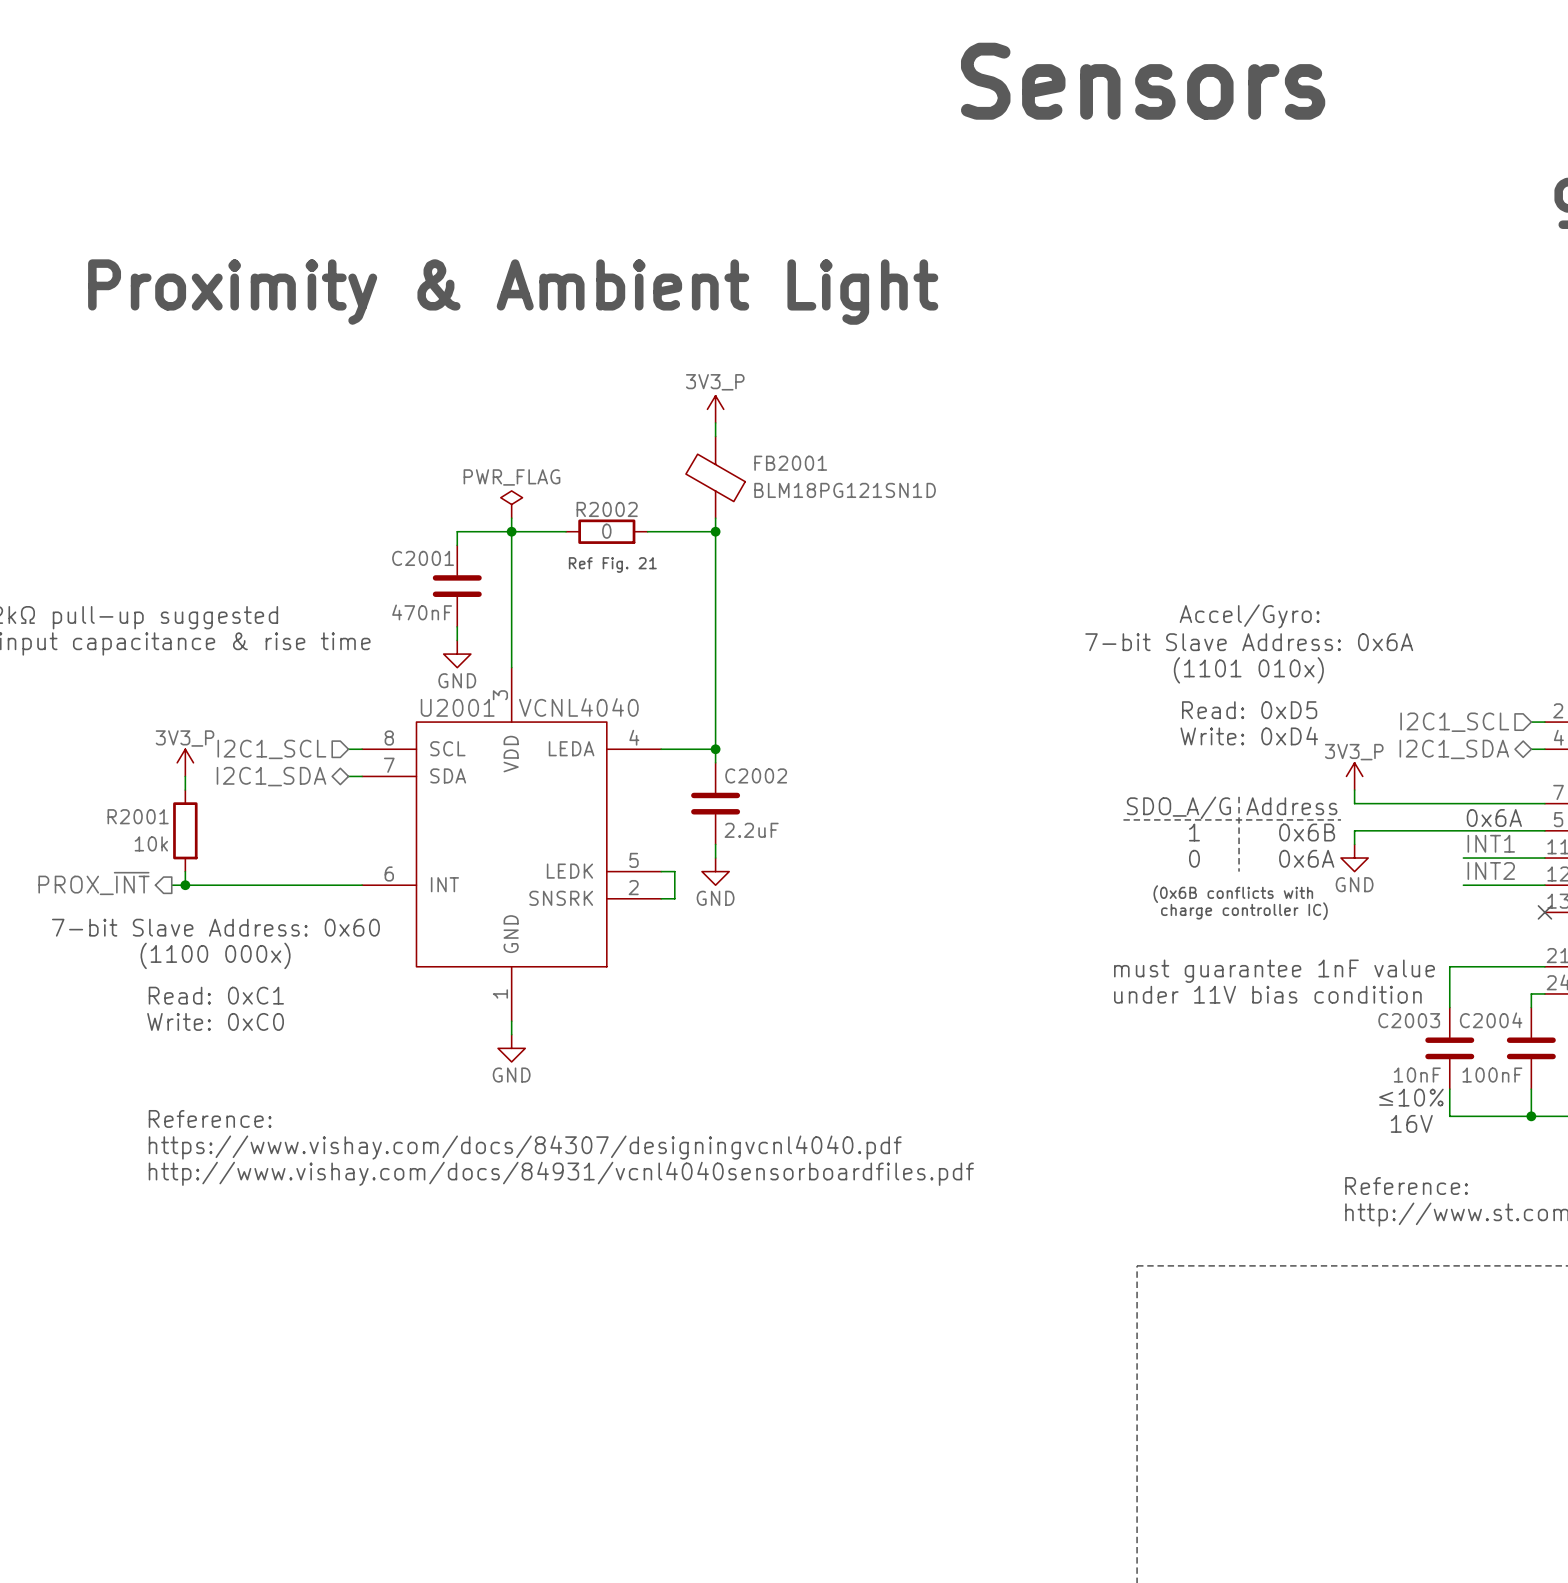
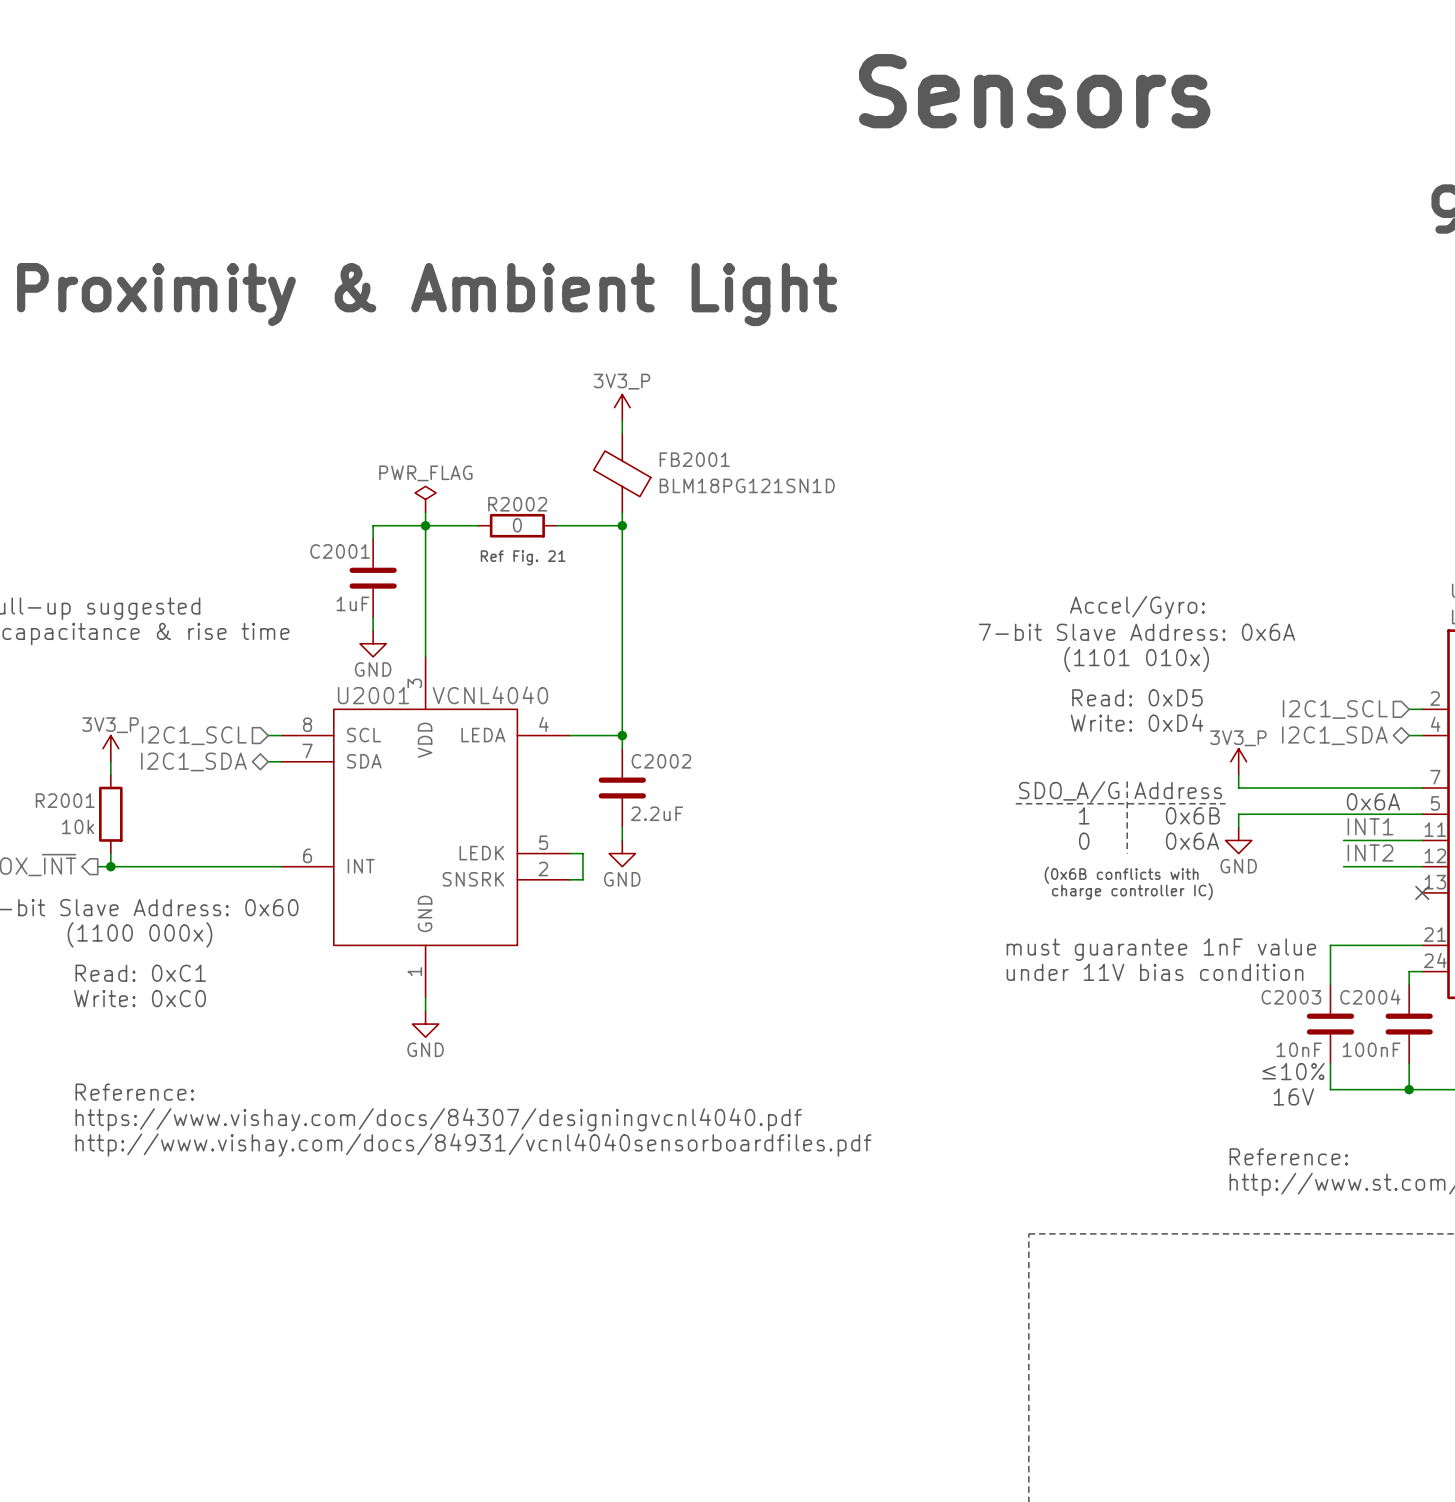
C2001 value: 470nF (422, 612) -> 1uF (352, 603)

